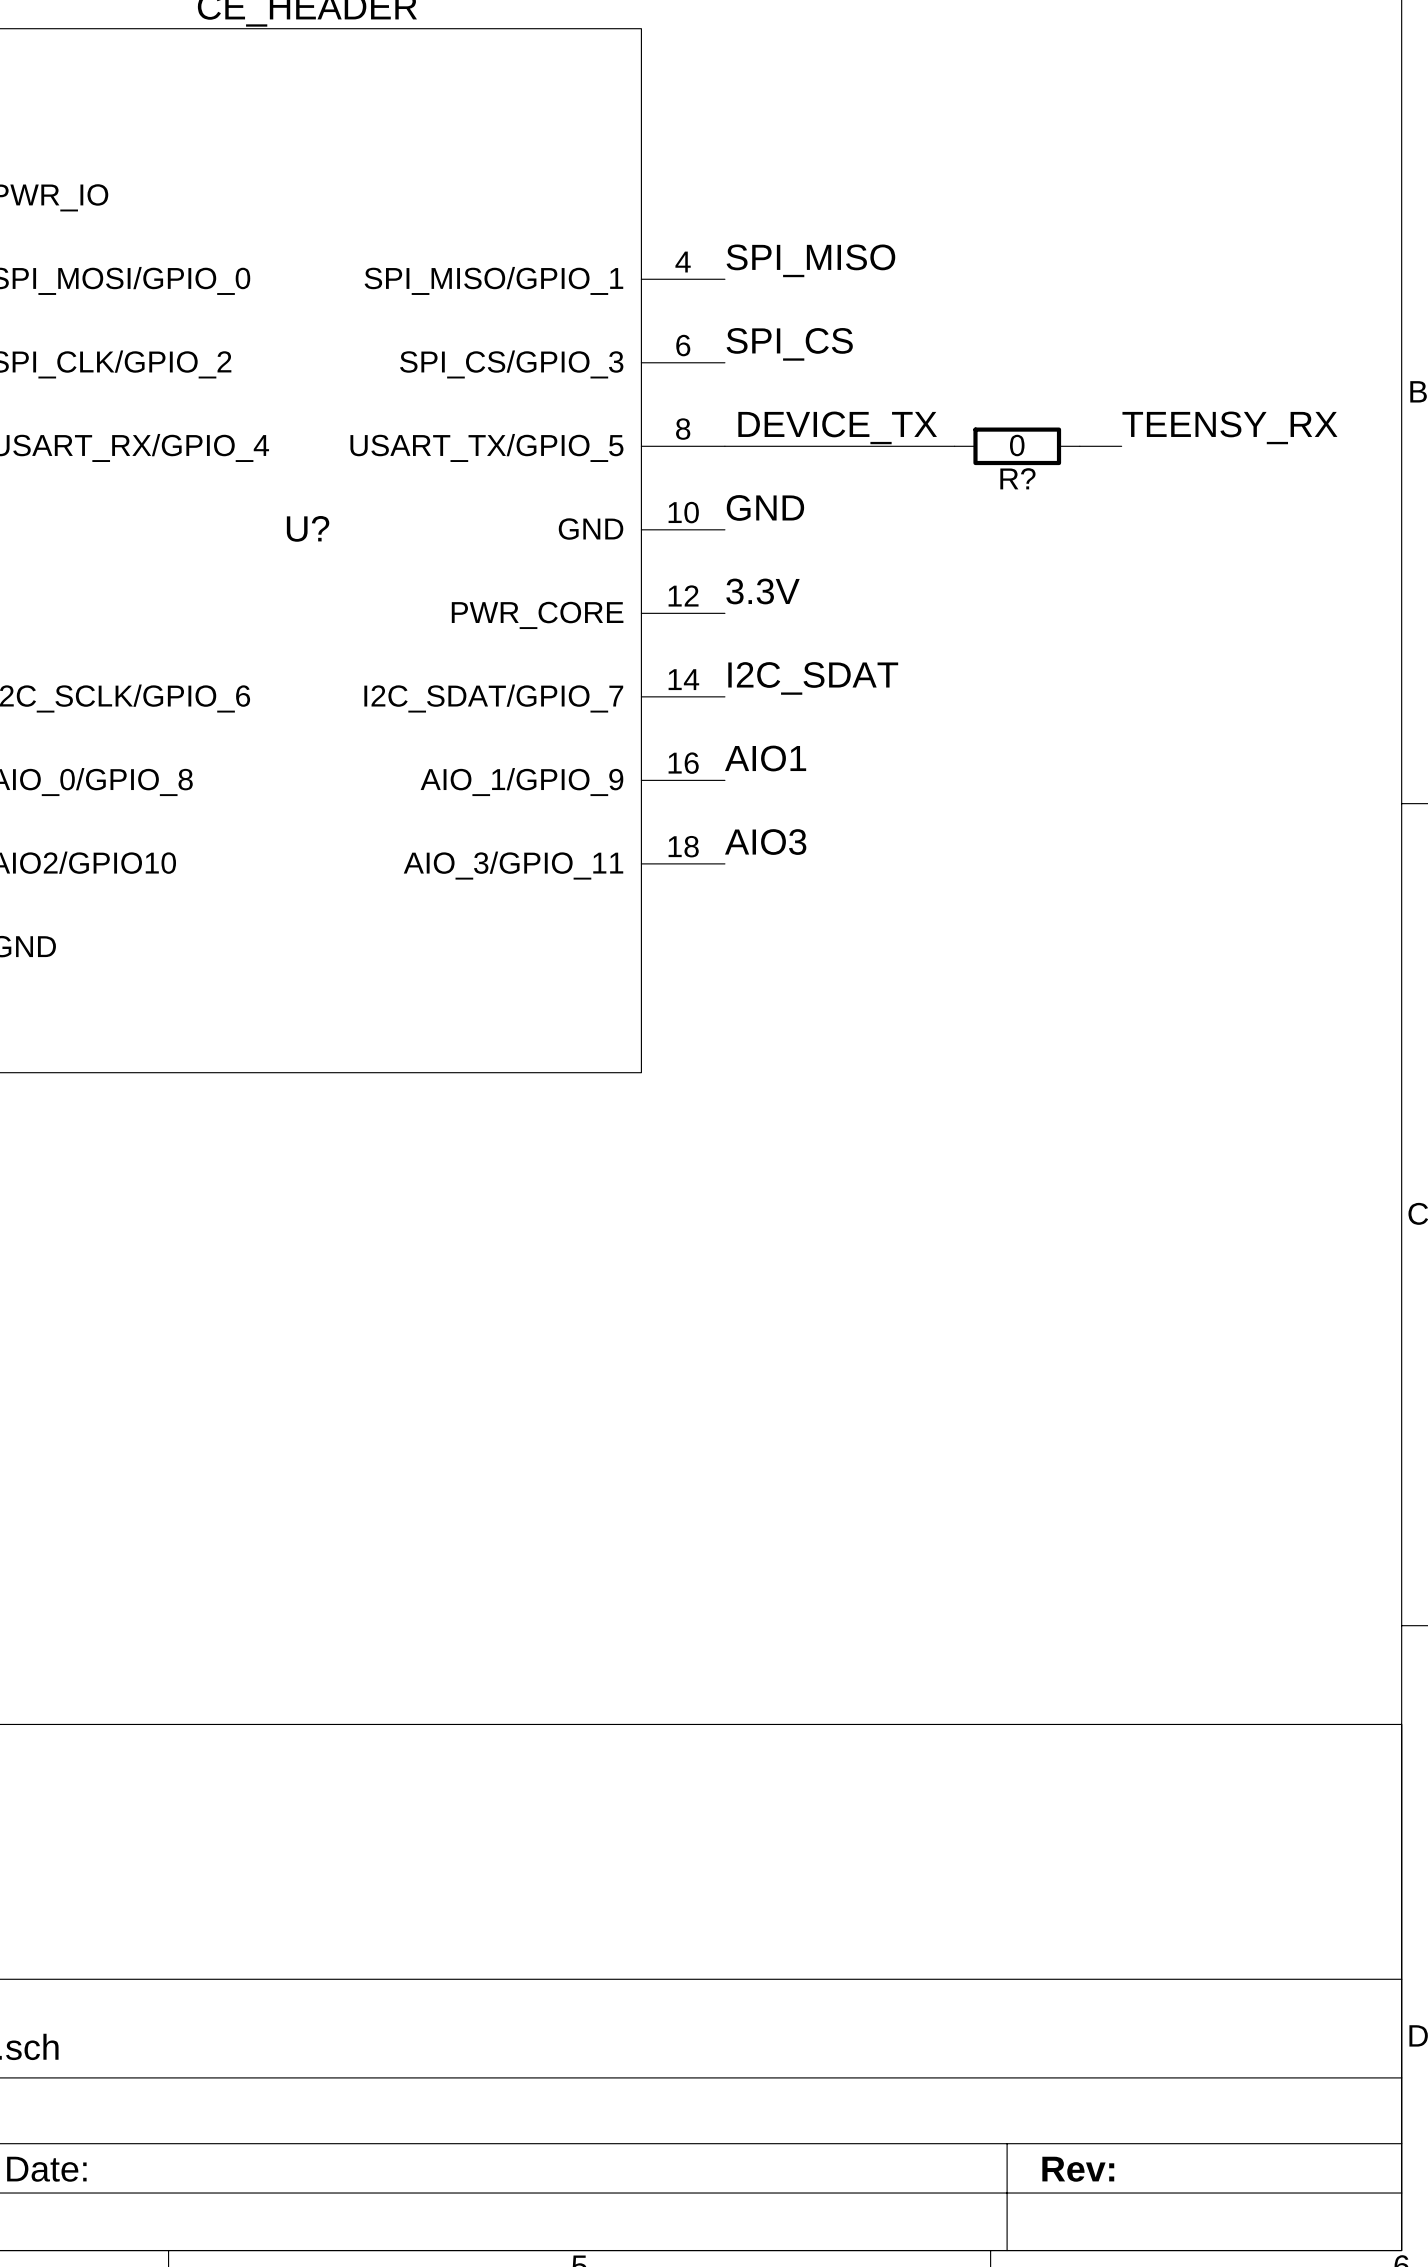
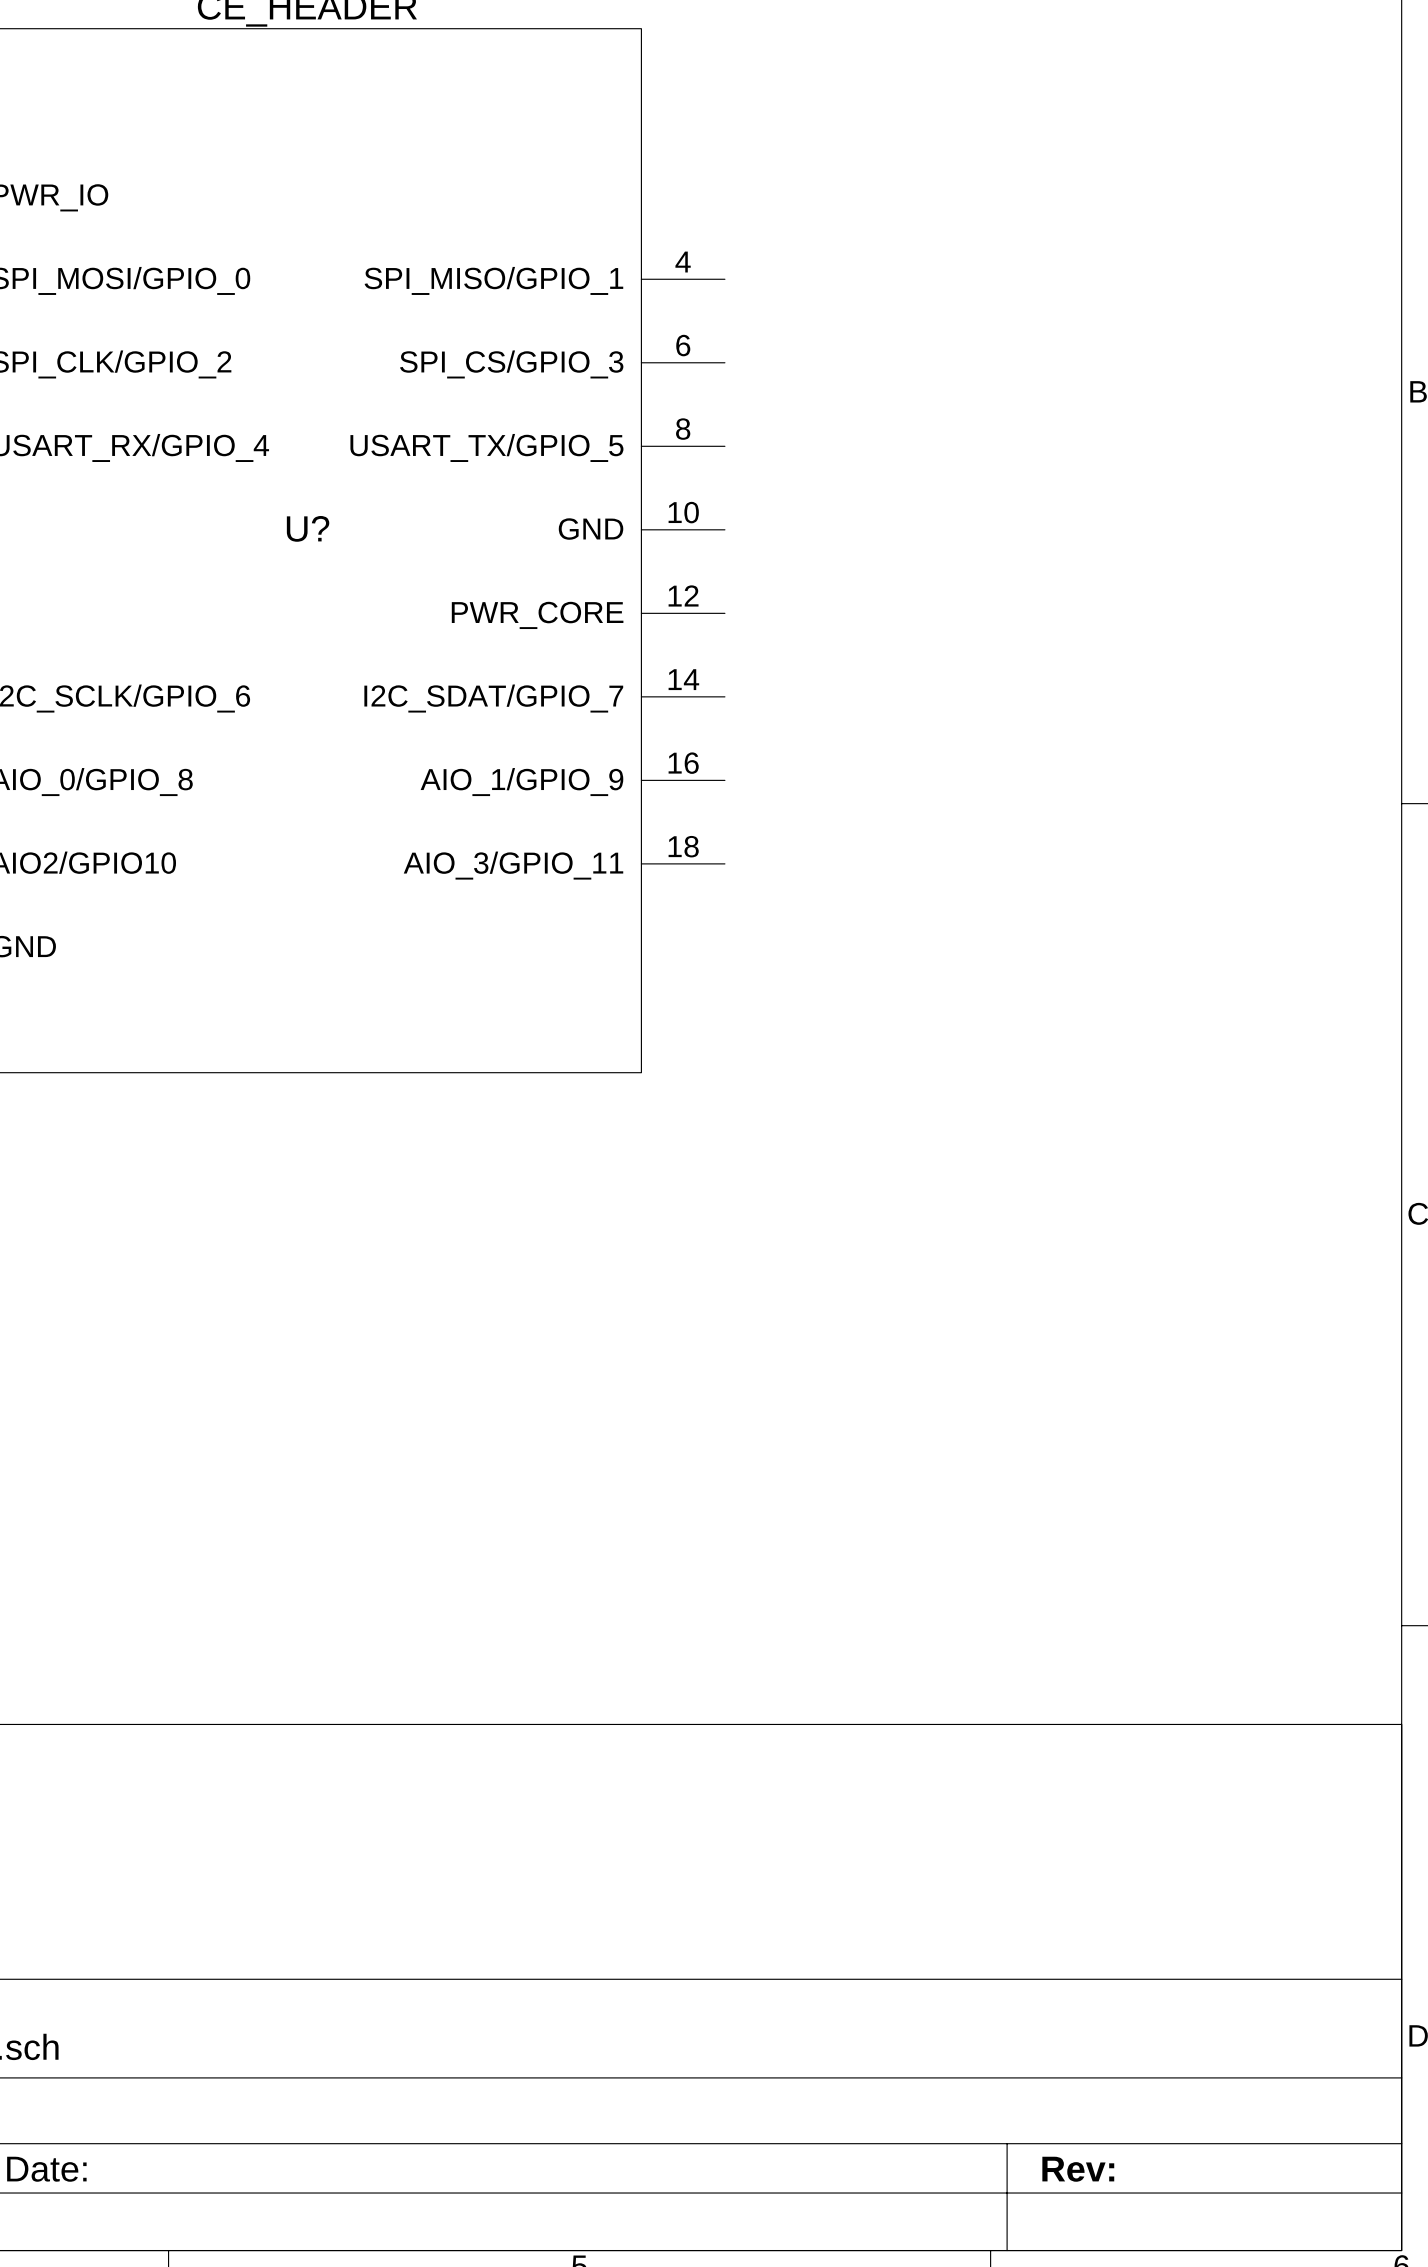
label: SPI_MISO (810, 260) -> none
label: SPI_CS (789, 344) -> none
label: DEVICE_TX (837, 427) -> none
label: TEENSY_RX (1229, 427) -> none
wire: (724, 446) (954, 446) -> none
R?: 0 (1017, 446) -> none
wire: (1079, 446) (1121, 446) -> none
label: GND (765, 507) -> none
label: 3.3V (763, 591) -> none
label: I2C_SDAT (813, 678) -> none
label: AIO1 (765, 758) -> none
label: AIO3 (765, 842) -> none

